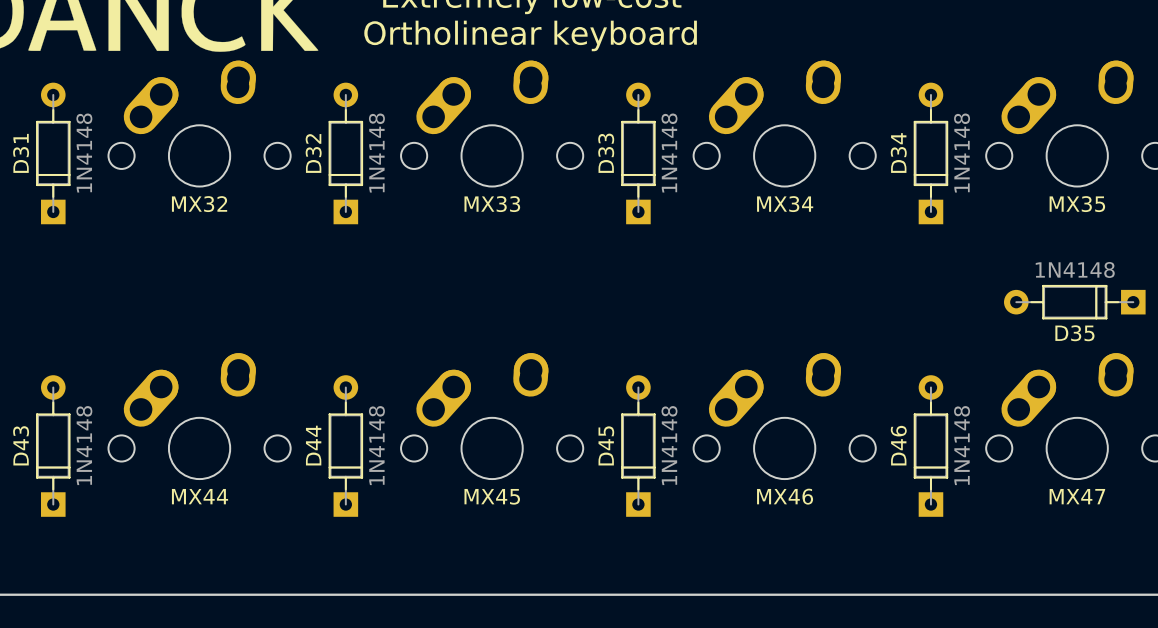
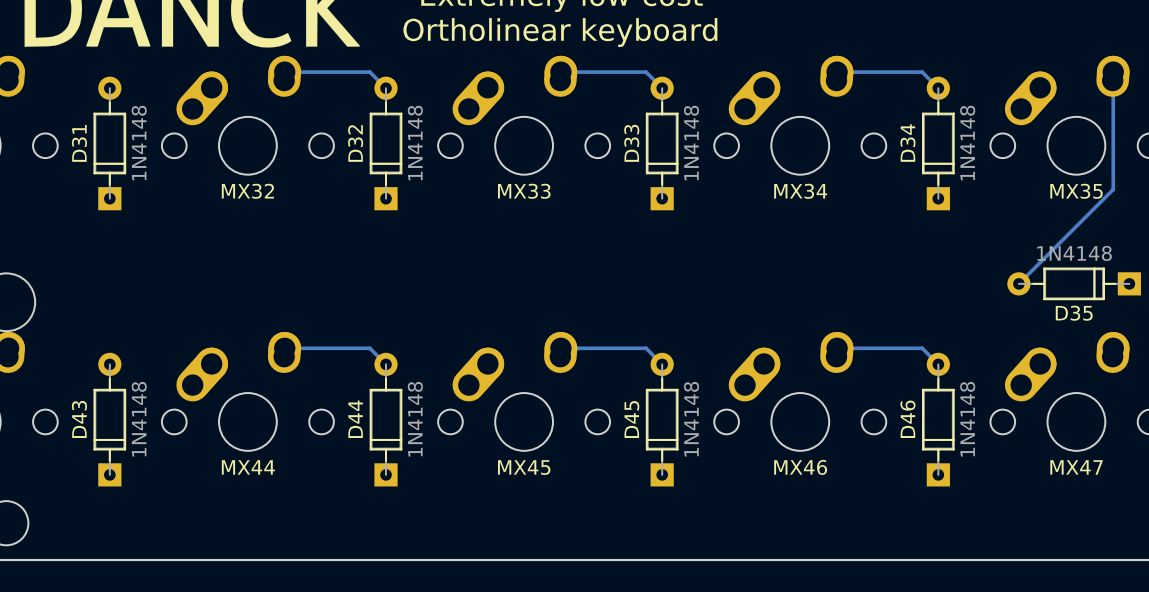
bottom track: none -> (284, 72) (369, 72) (386, 88)
bottom track: none -> (560, 72) (646, 72) (662, 88)
bottom track: none -> (837, 72) (922, 72) (938, 88)
bottom track: none -> (1113, 72) (1113, 189) (1018, 283)
bottom track: none -> (284, 348) (369, 348) (386, 364)
bottom track: none -> (837, 348) (922, 348) (938, 364)
bottom track: none -> (560, 356) (569, 356) (577, 348) (646, 348) (662, 364)

